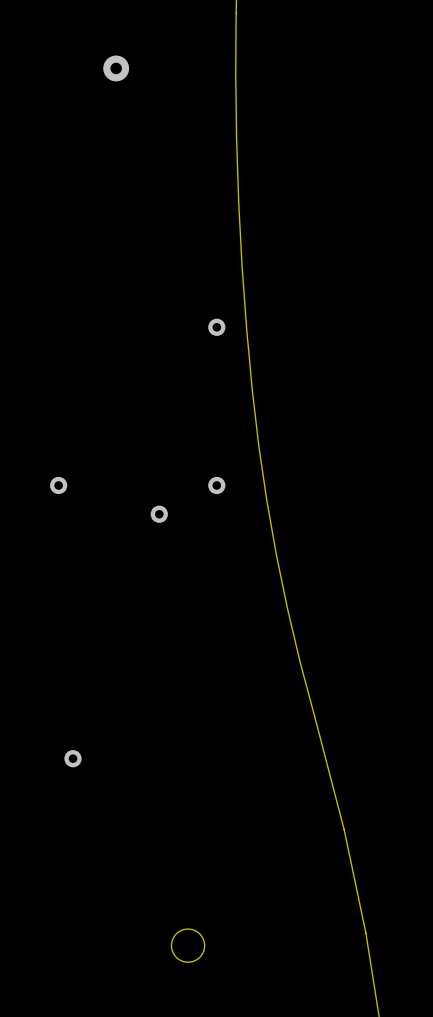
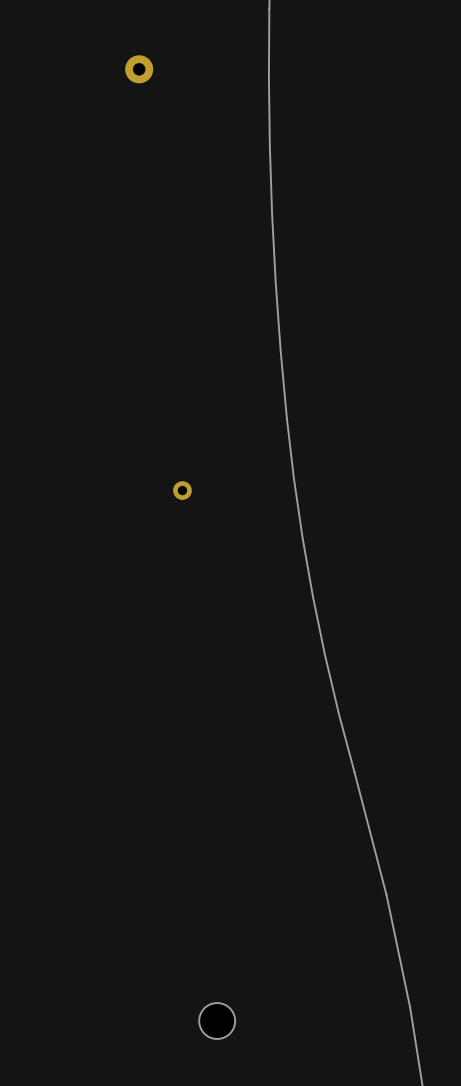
via: (216, 327) -> none
via: none -> (182, 490)
via: (58, 485) -> none
via: (216, 485) -> none
via: (159, 514) -> none
via: (73, 758) -> none

